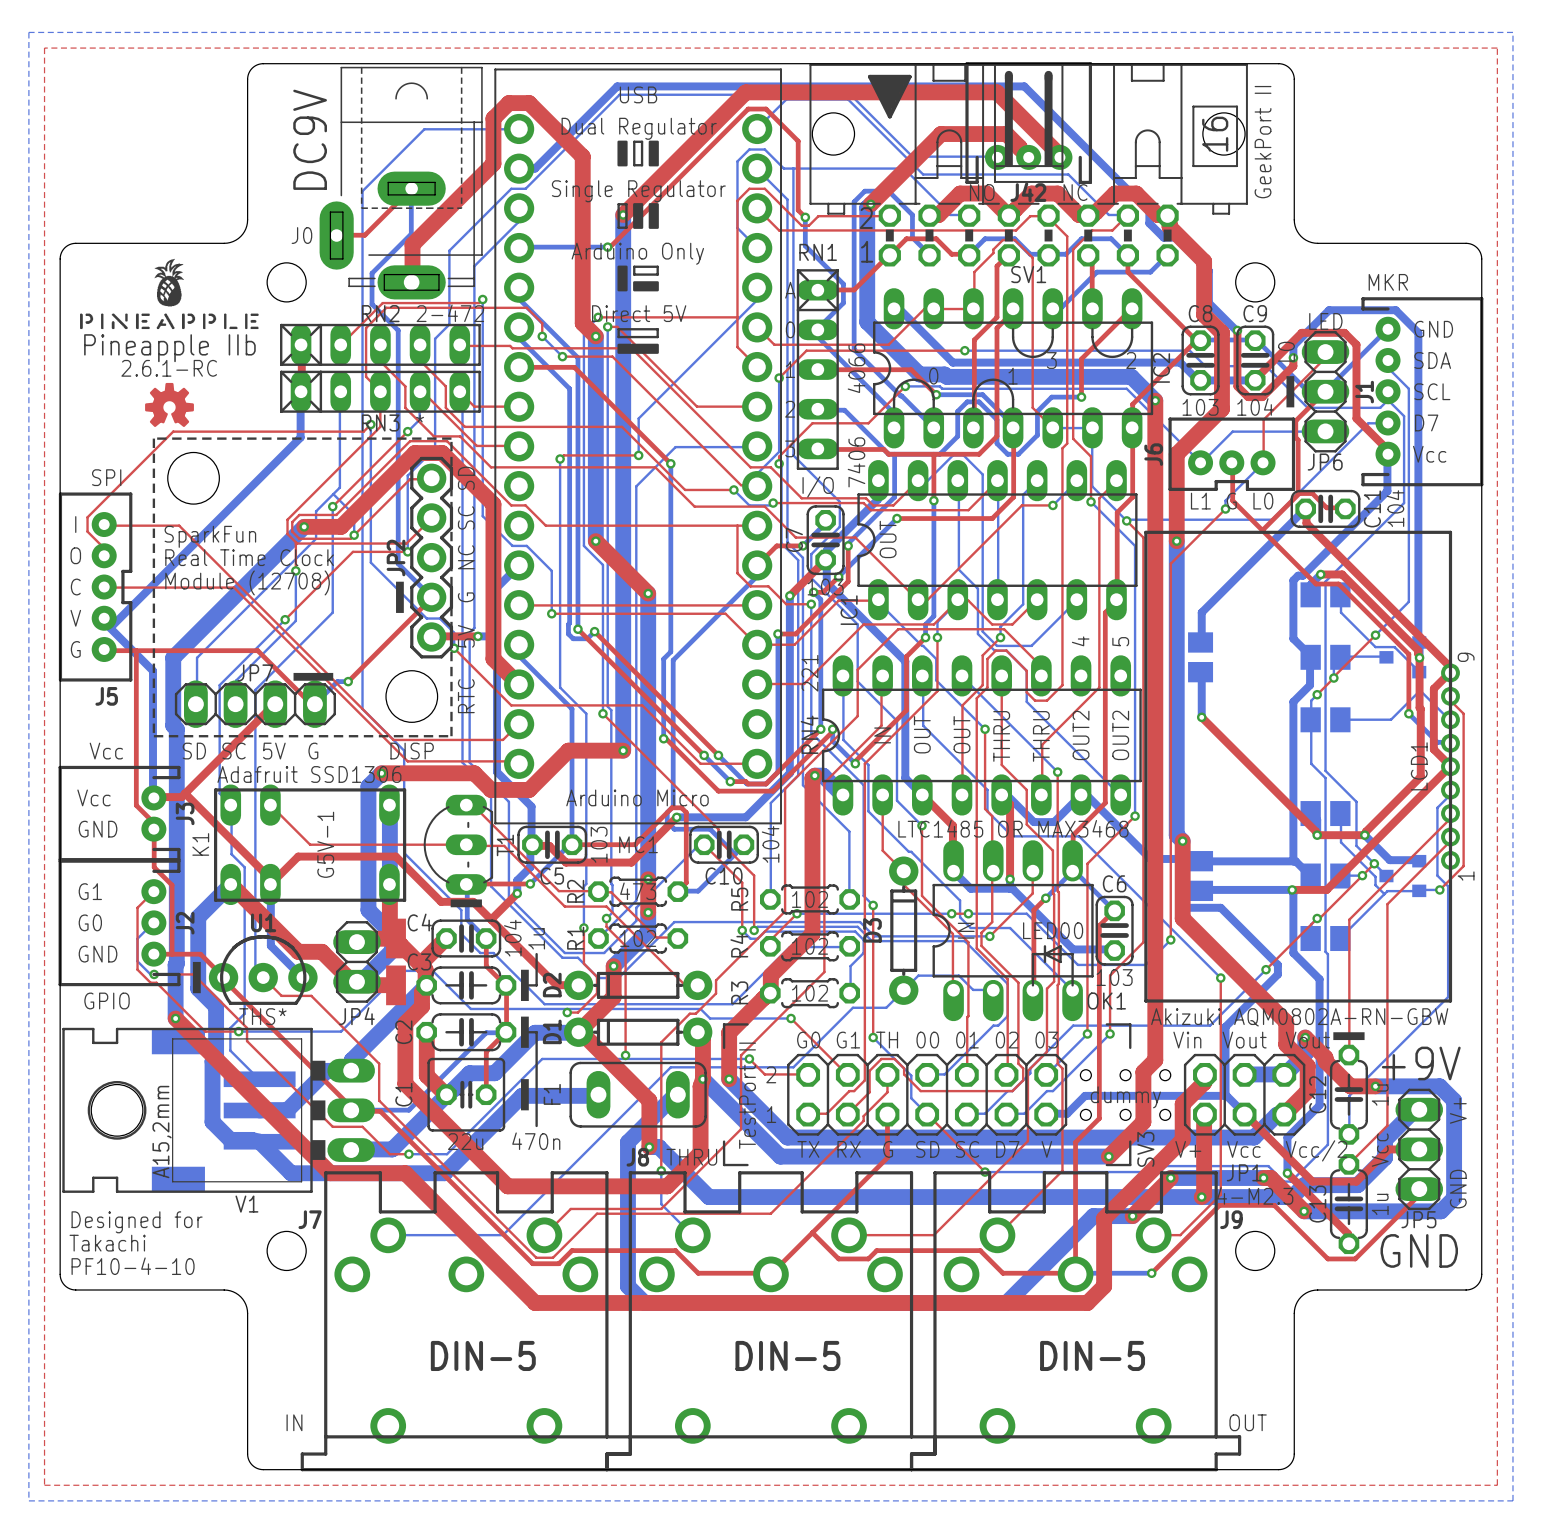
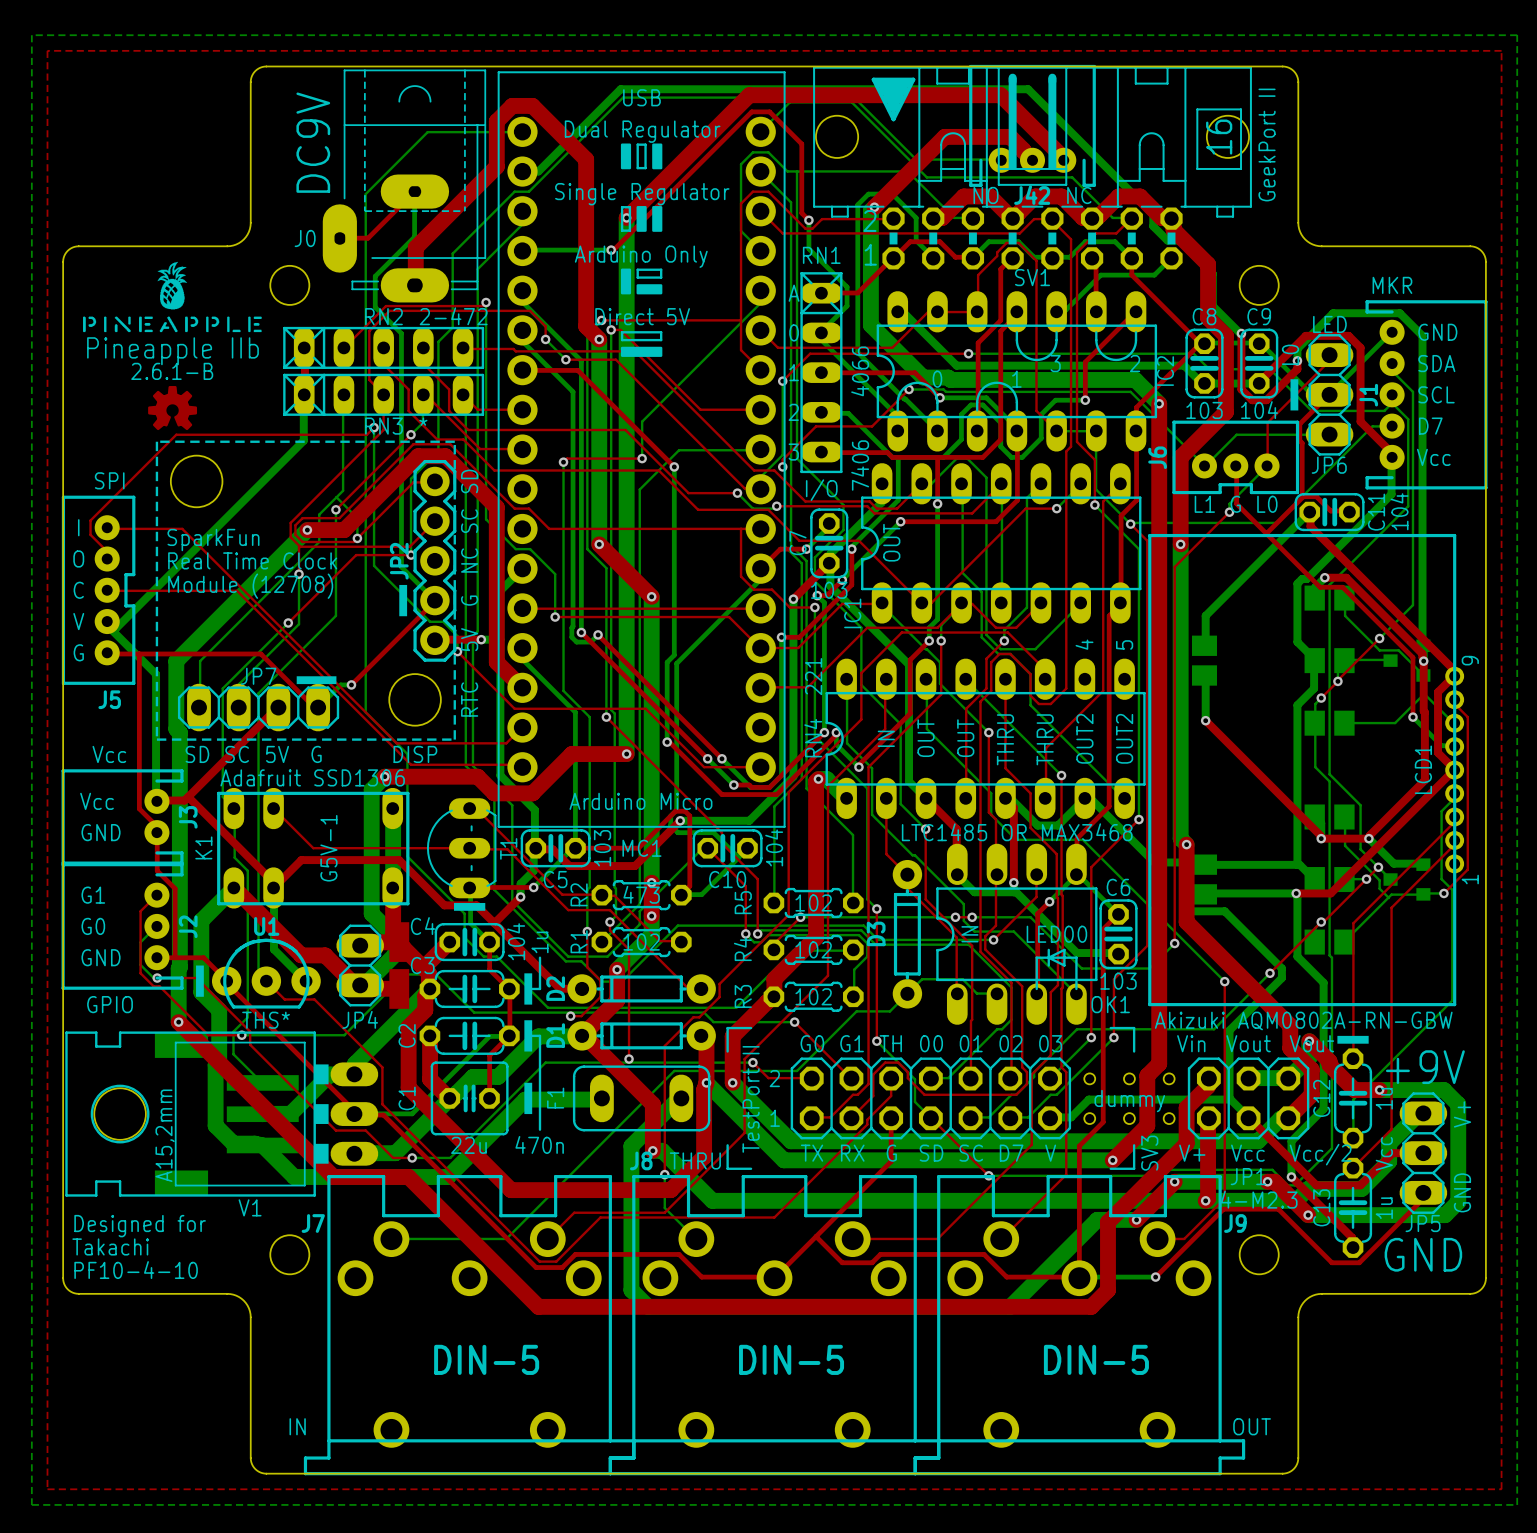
text: 2.6.1-RC (169, 368) -> 2.6.1-B (172, 371)

